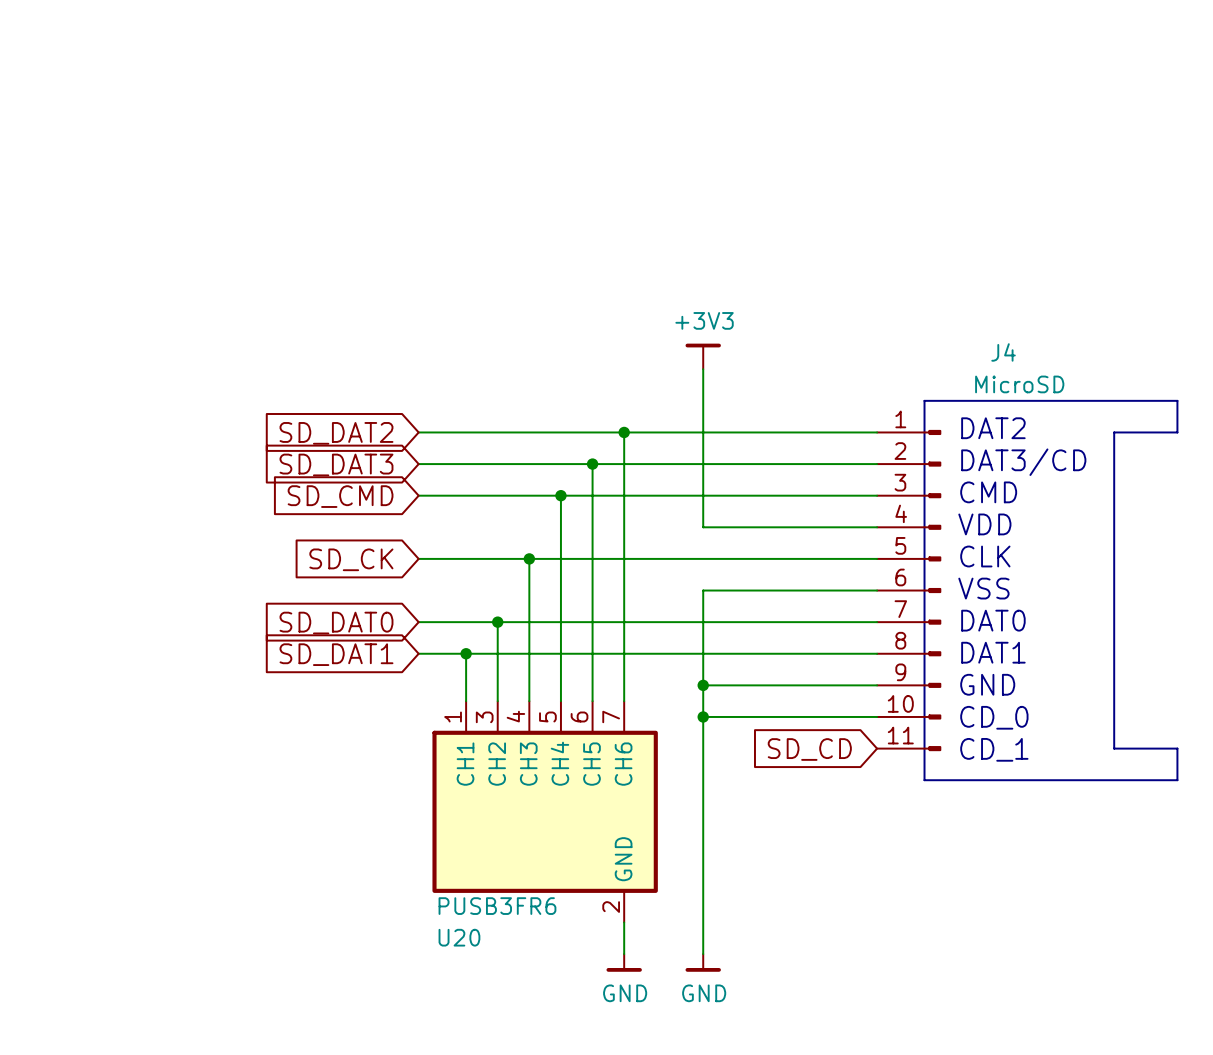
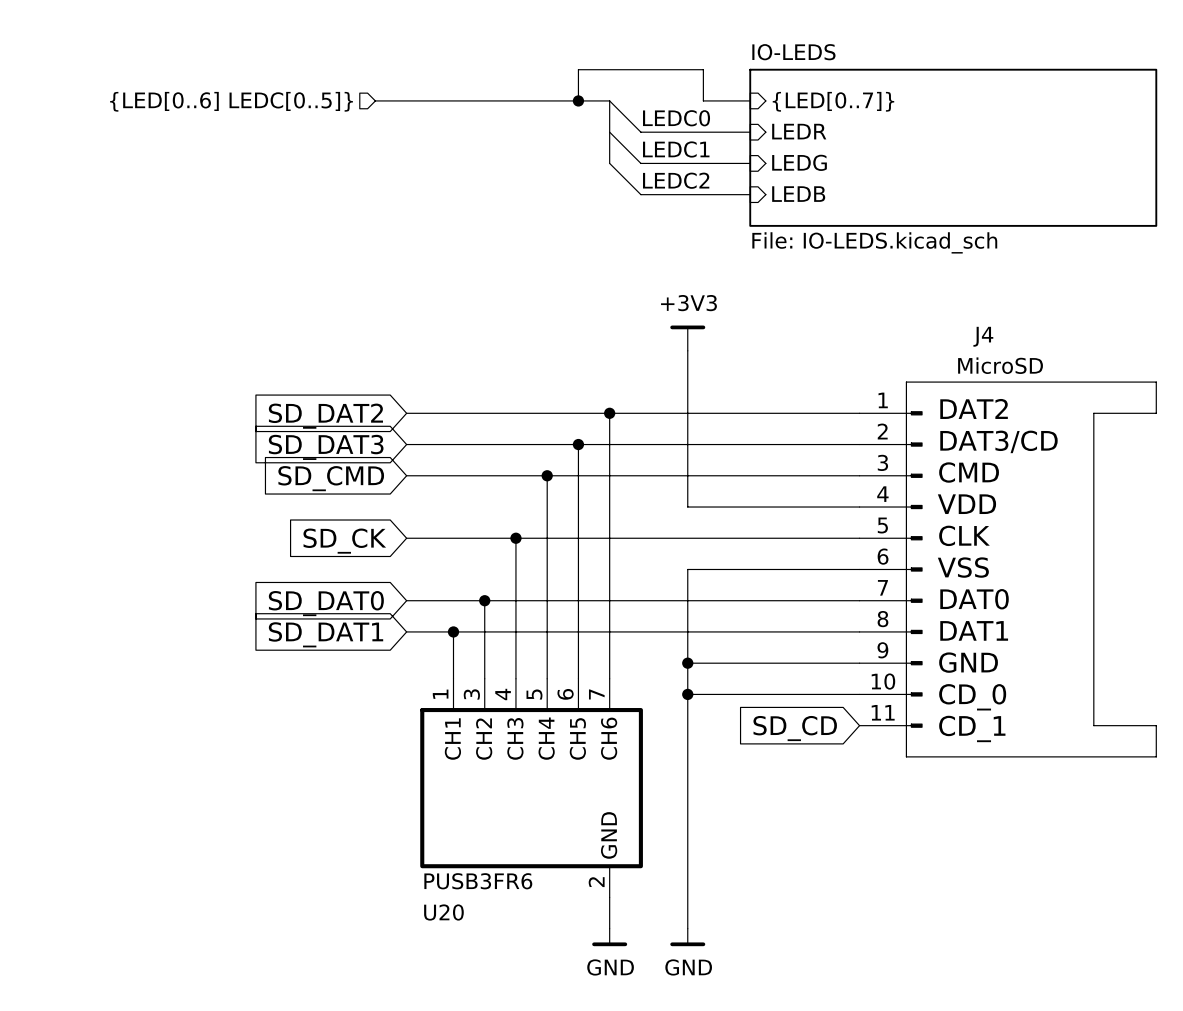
bus: none -> (375, 100) (609, 100) (609, 163)
bus: none -> (578, 100) (578, 69) (703, 69) (703, 100) (750, 100)
junction: none -> (578, 100)
wire: none -> (609, 100) (640, 132) (750, 132)
hierarchical label: none -> {LED[0..6] LEDC[0..5]} (231, 101)
sheet pin: none -> {LED[0..7]} (833, 101)
label: none -> LEDC0 (676, 118)
wire: none -> (609, 132) (640, 163) (750, 163)
sheet pin: none -> LEDR (799, 131)
sheet IO-LEDS: none -> File: IO-LEDS.kicad_sch (953, 147)
label: none -> LEDC1 (676, 149)
sheet pin: none -> LEDG (799, 162)
wire: none -> (609, 163) (640, 194) (750, 194)
label: none -> LEDC2 (676, 180)
sheet pin: none -> LEDB (798, 194)

